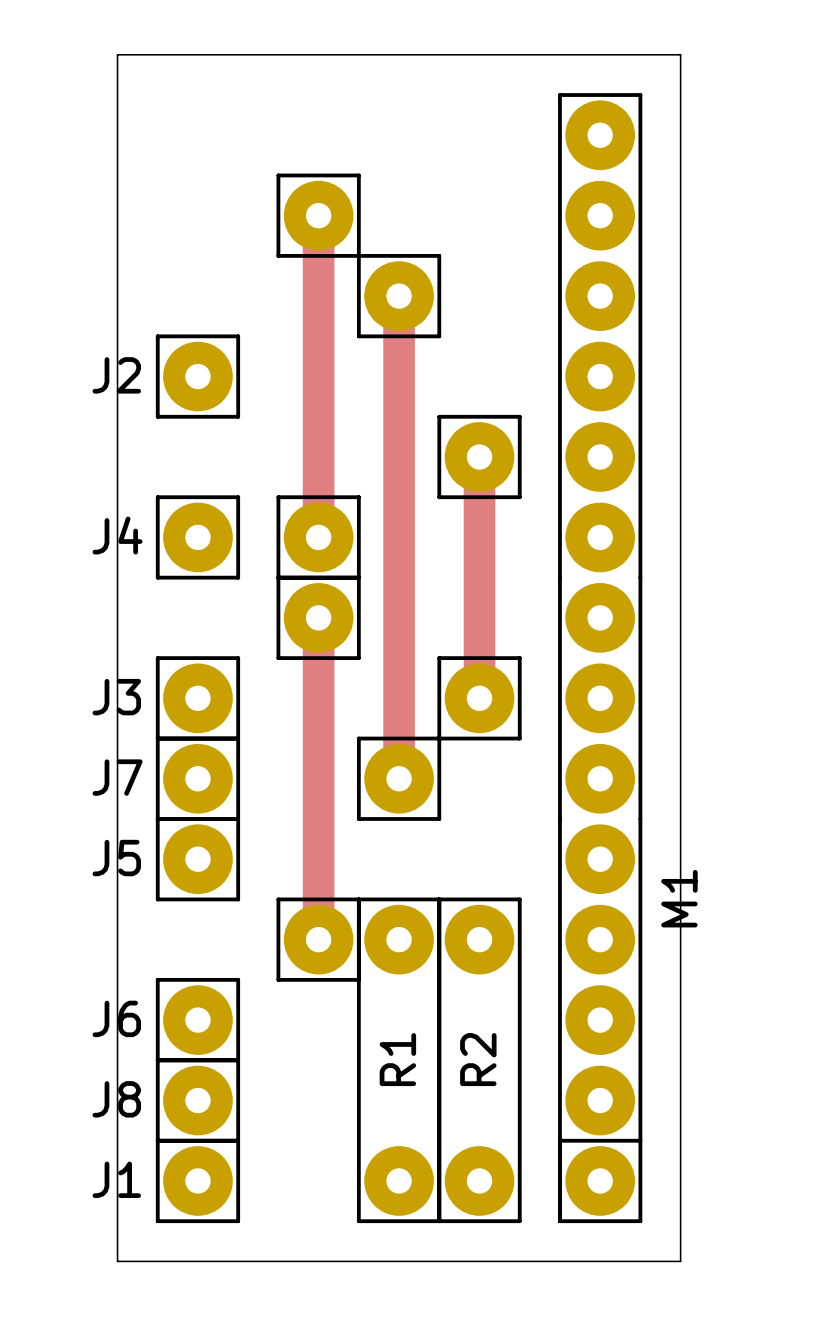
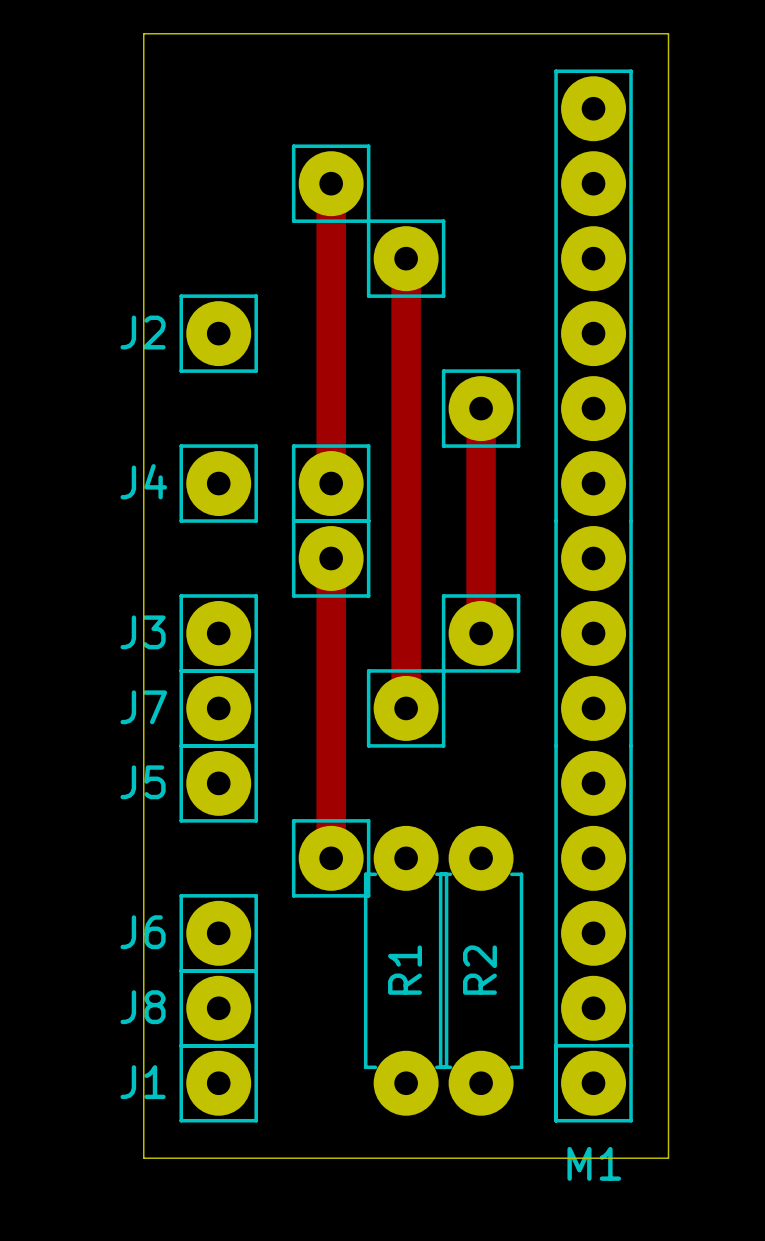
R1 footprint: [356, 897, 442, 1224] -> [363, 825, 449, 1116]
R2 footprint: [437, 897, 522, 1224] -> [438, 825, 524, 1116]
M1 name rotation: 0° (679, 898) -> 90° clockwise (594, 1163)
M1 name position: M1 (679, 898) -> M1 (594, 1163)

